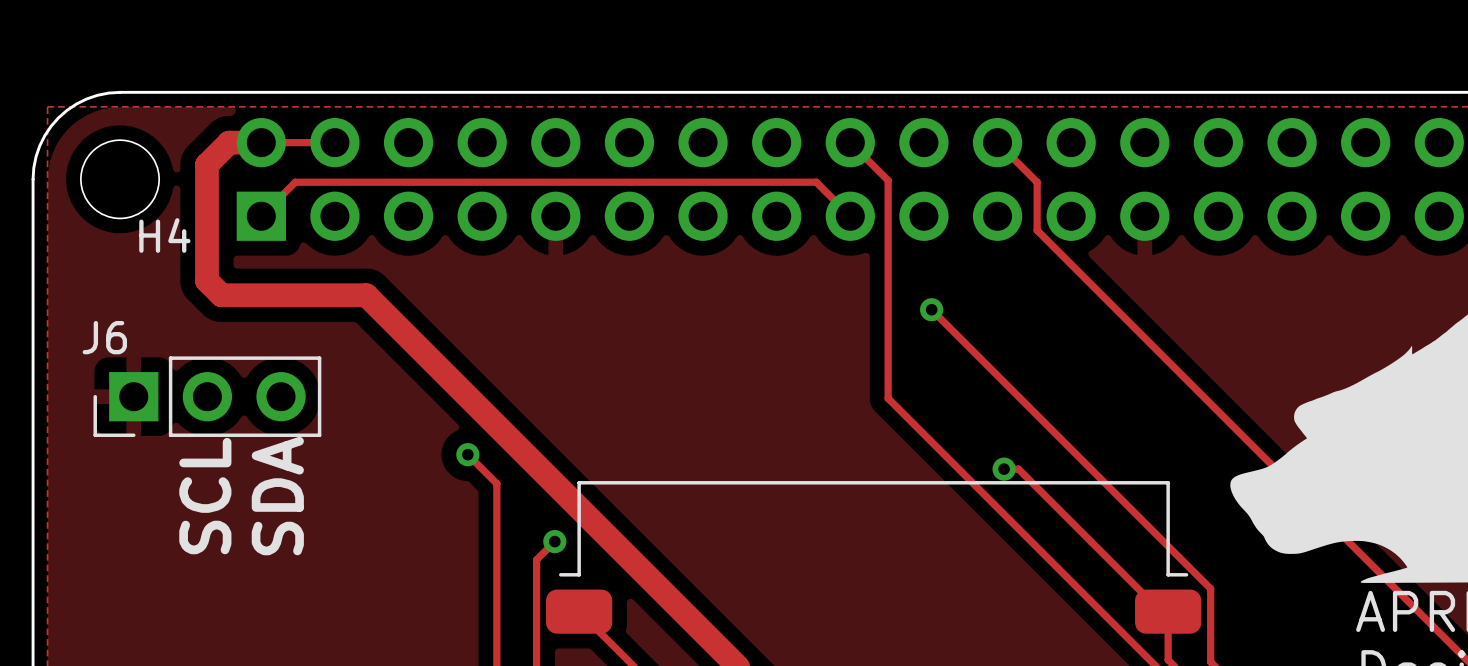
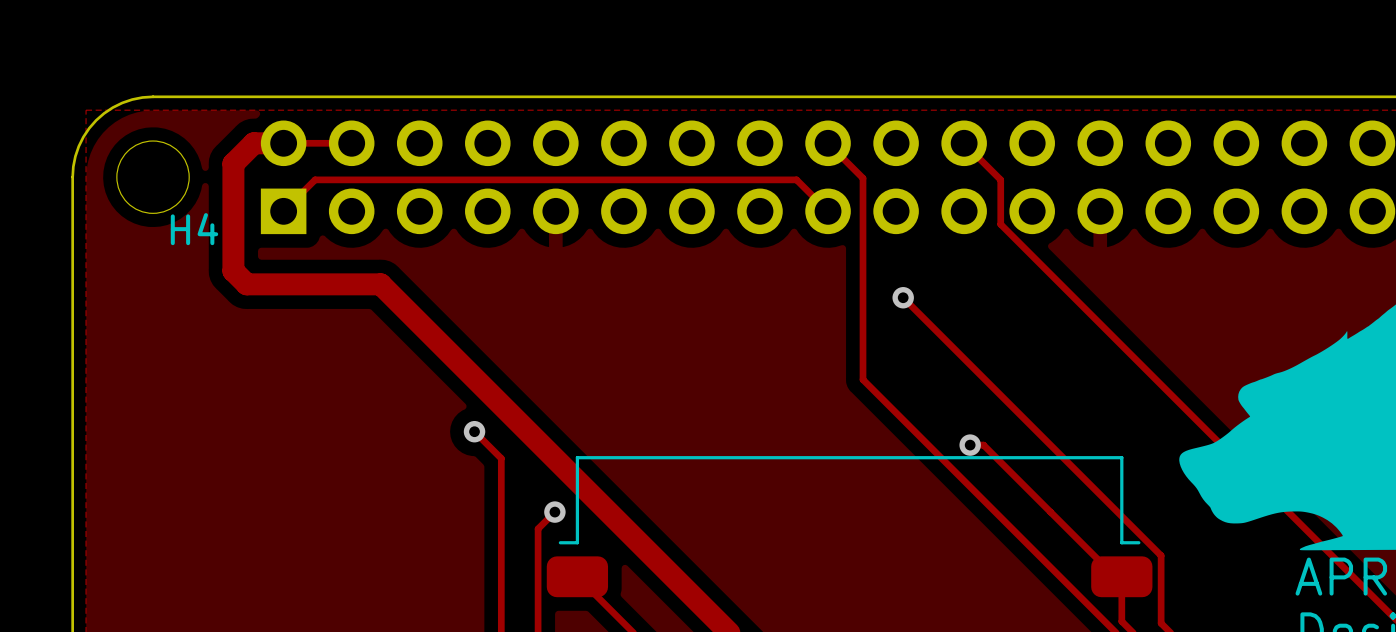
J6: (207, 396) -> none
text: SCL (205, 496) -> none
text: SDA (277, 496) -> none

